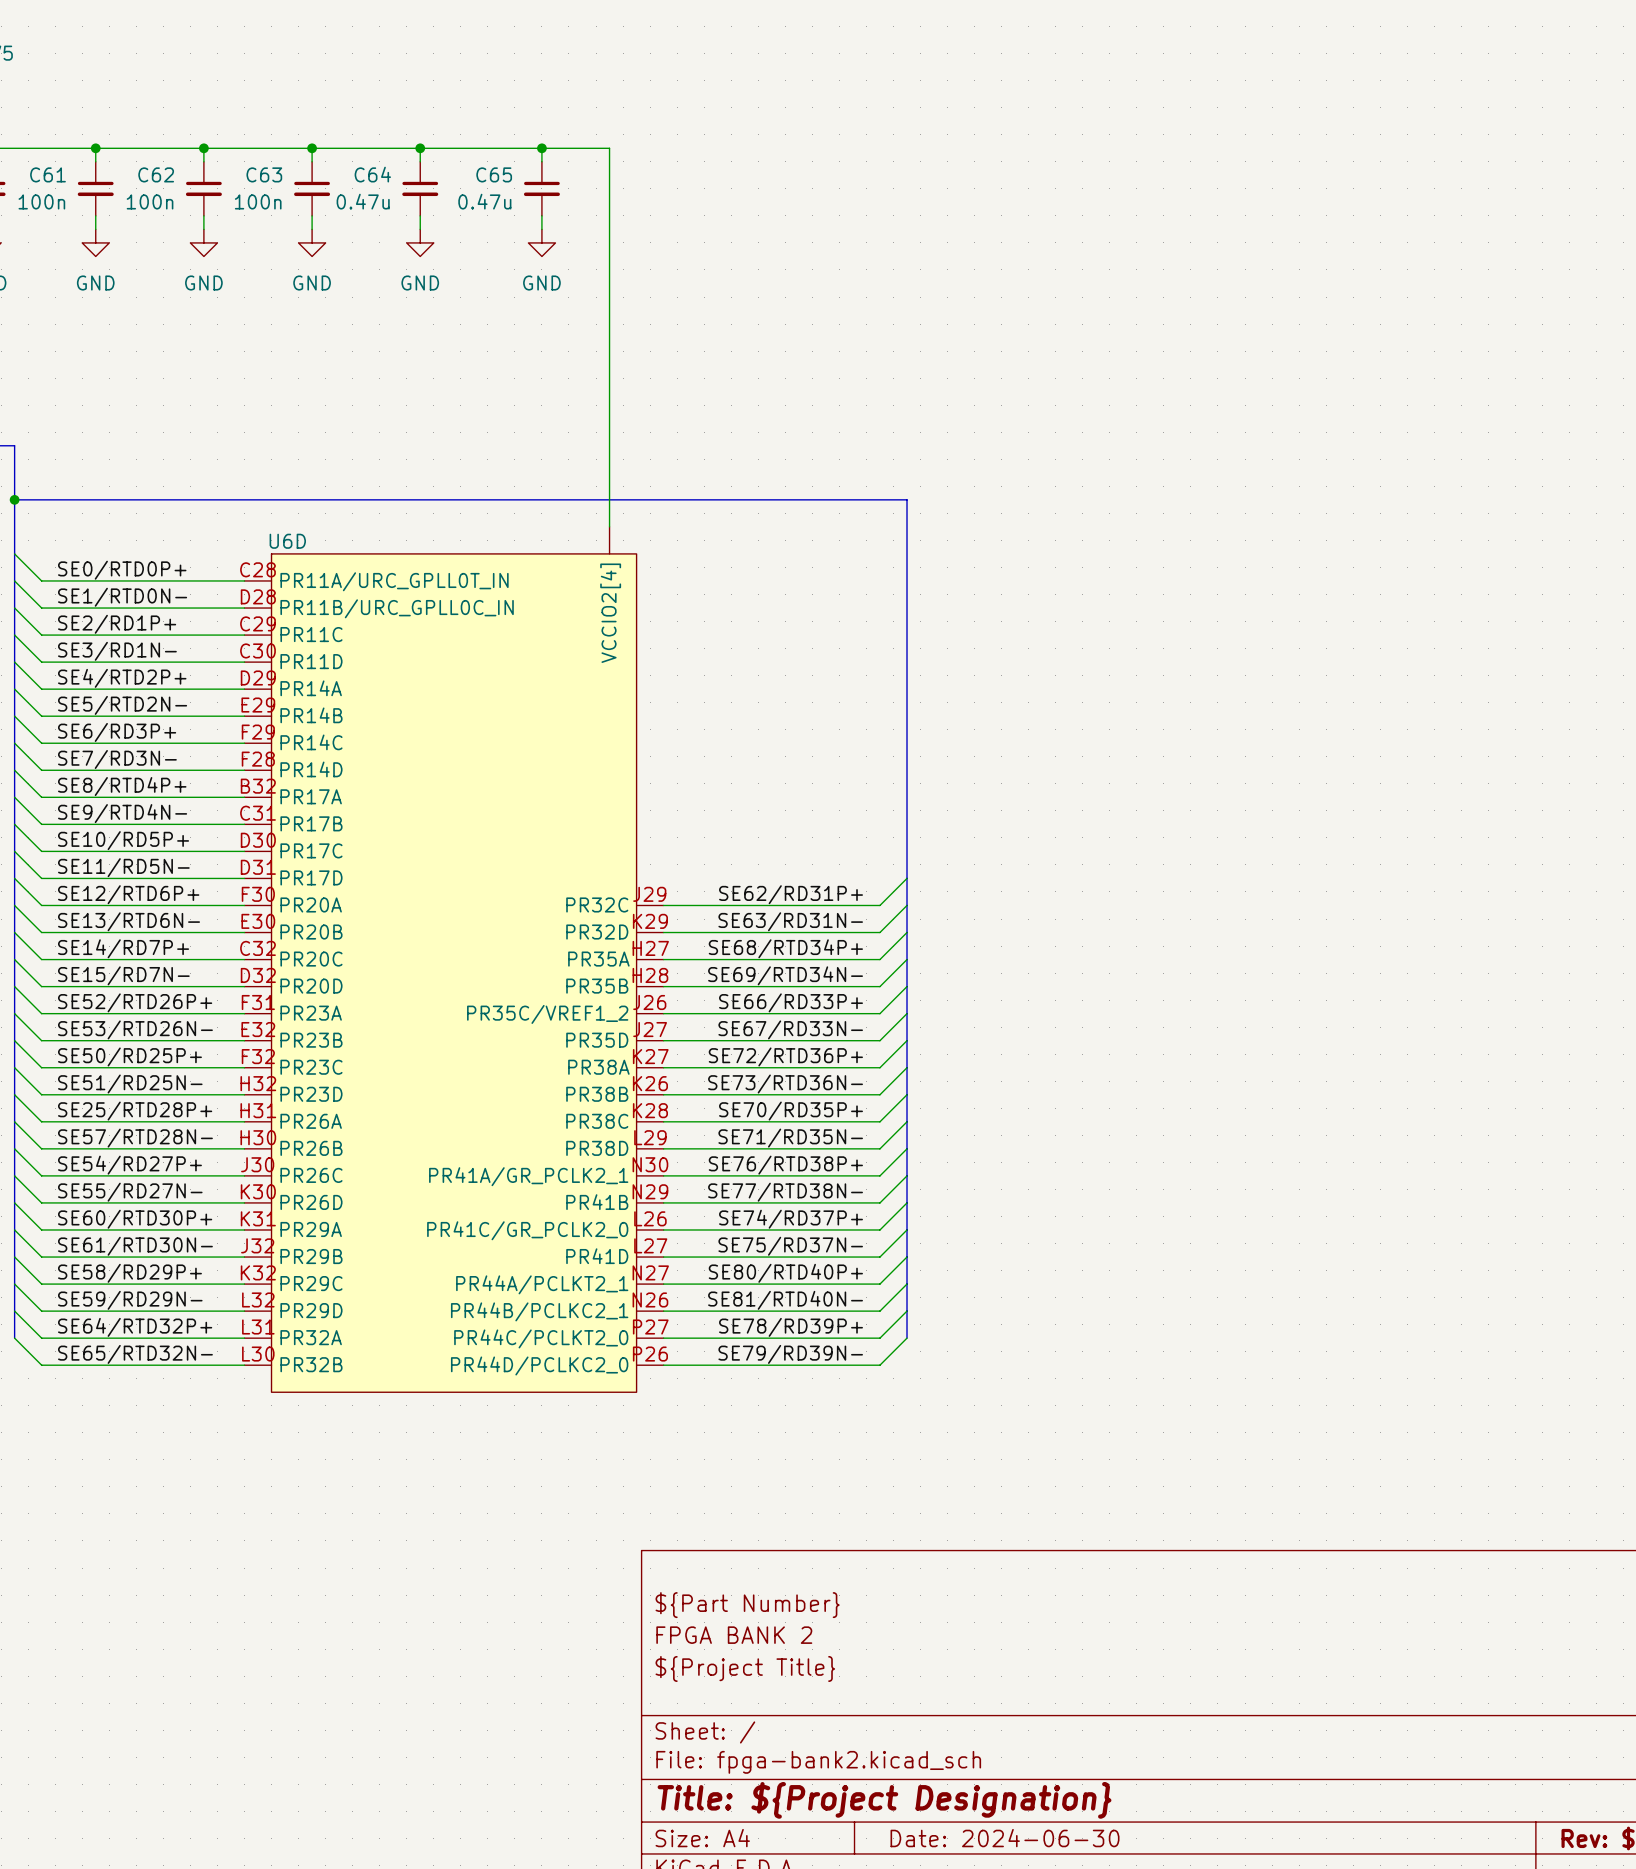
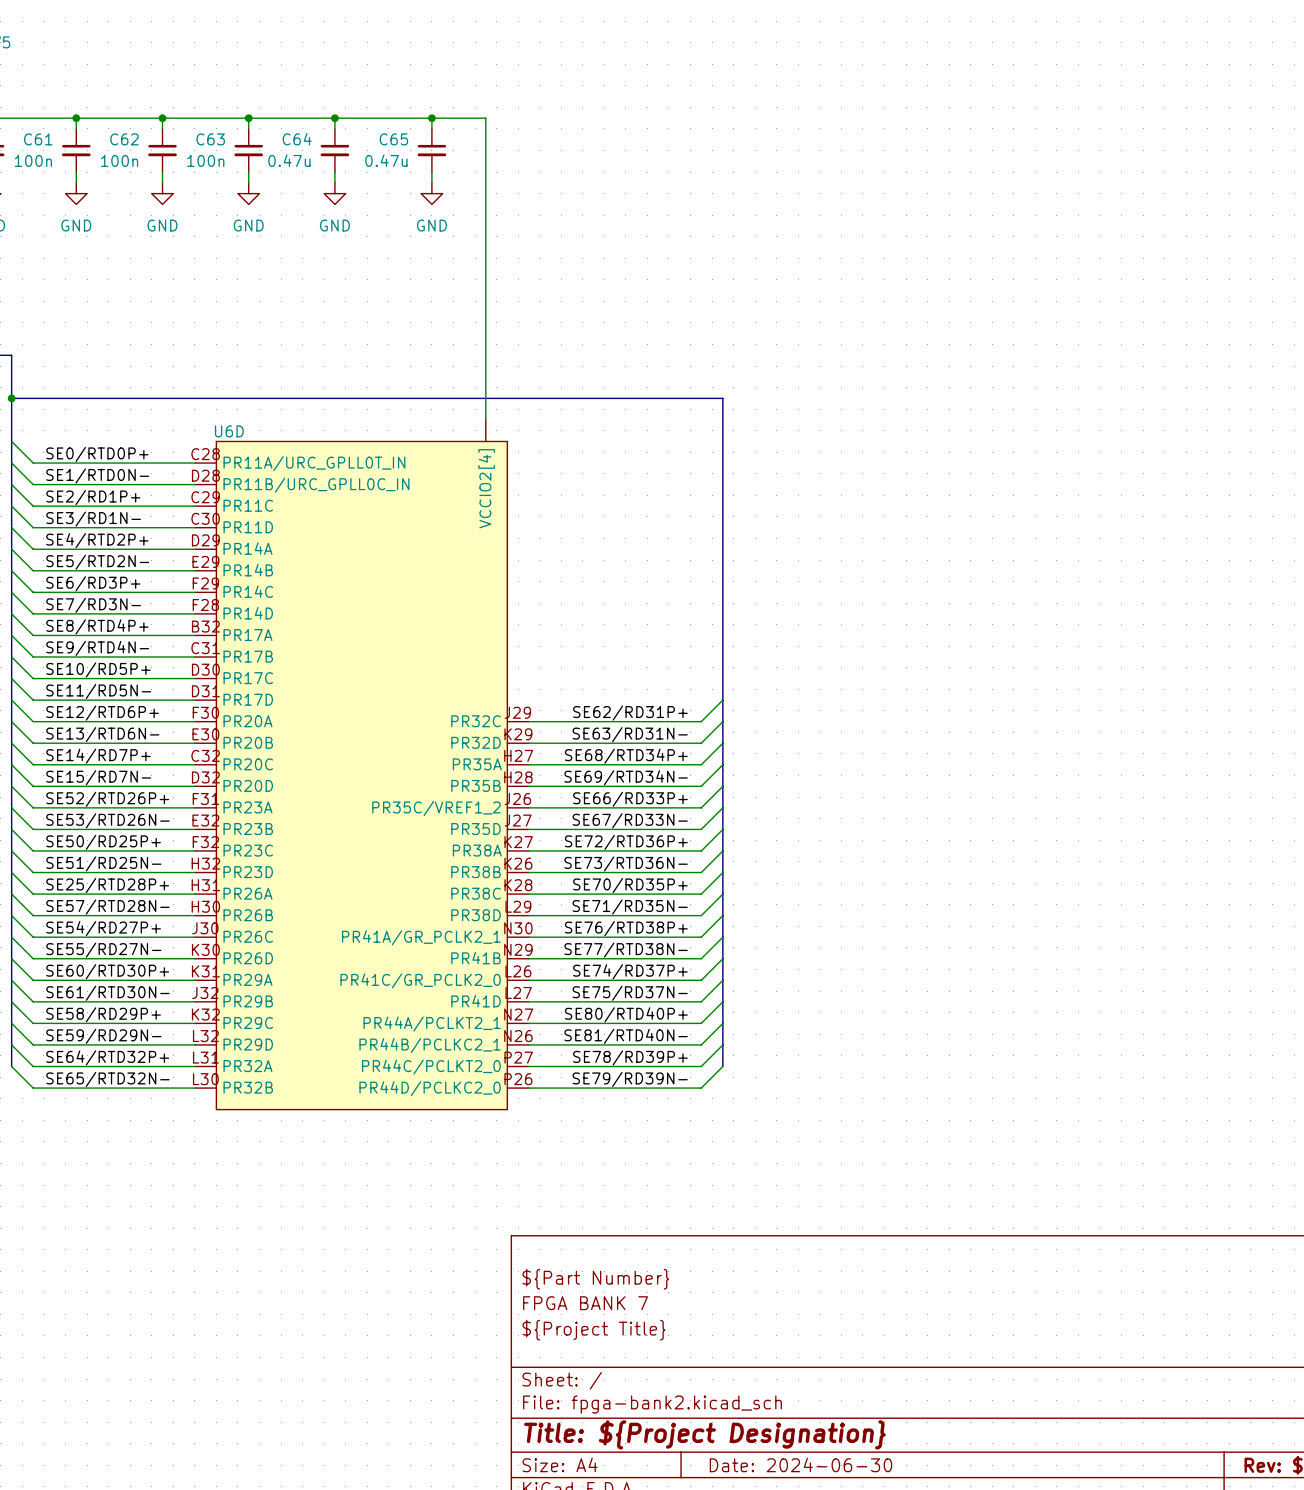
title block: FPGA BANK 2 (734, 1635) -> FPGA BANK 7 (585, 1303)

